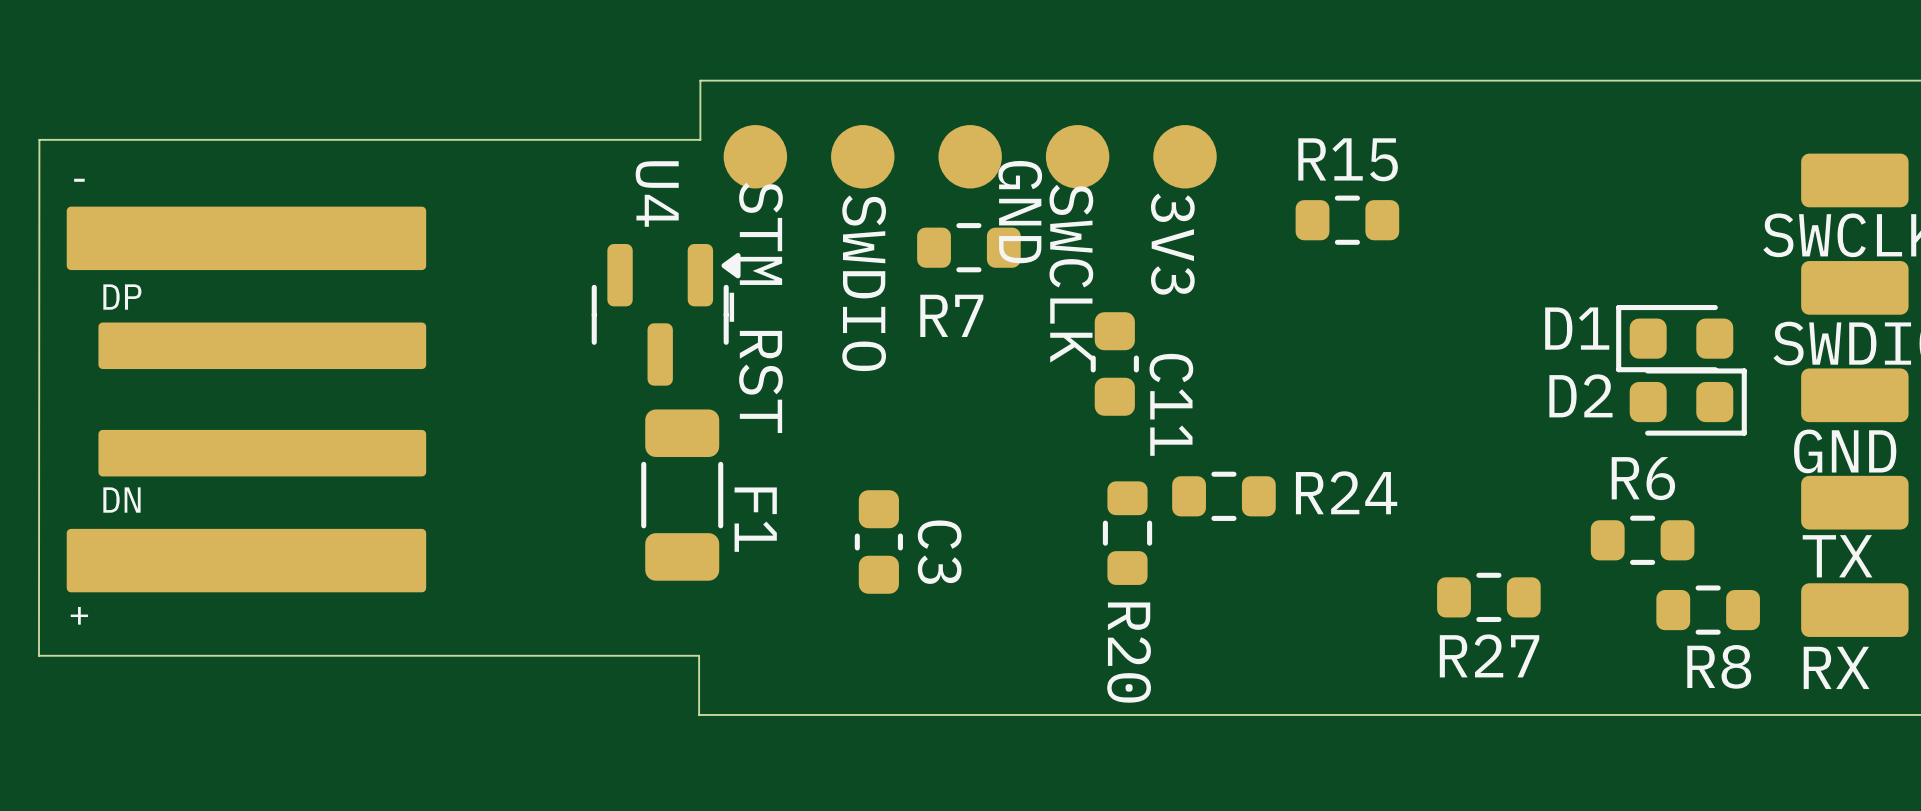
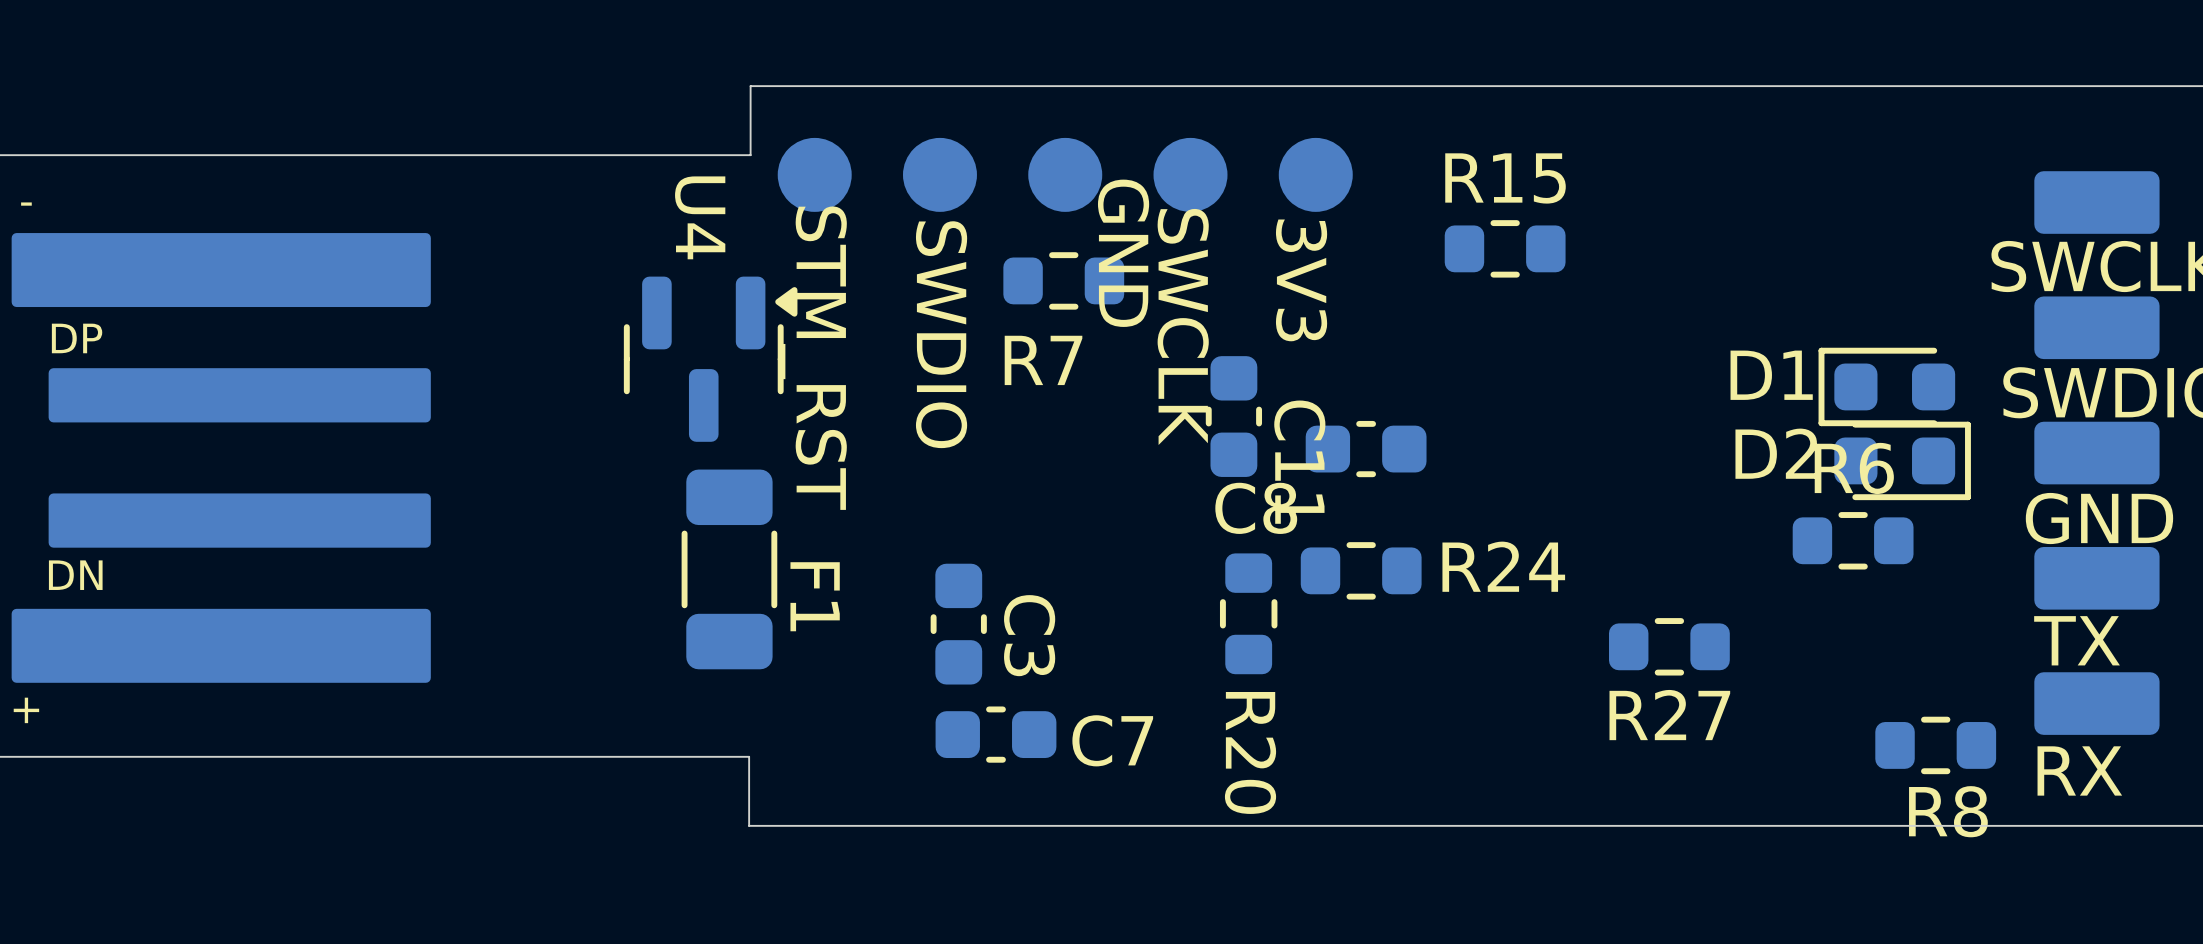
C8: none -> (1366, 449)
R6 position: (1642, 540) -> (1853, 540)
R27 position: (1488, 597) -> (1669, 646)
R8 position: (1708, 610) -> (1935, 745)
C7: none -> (995, 734)

